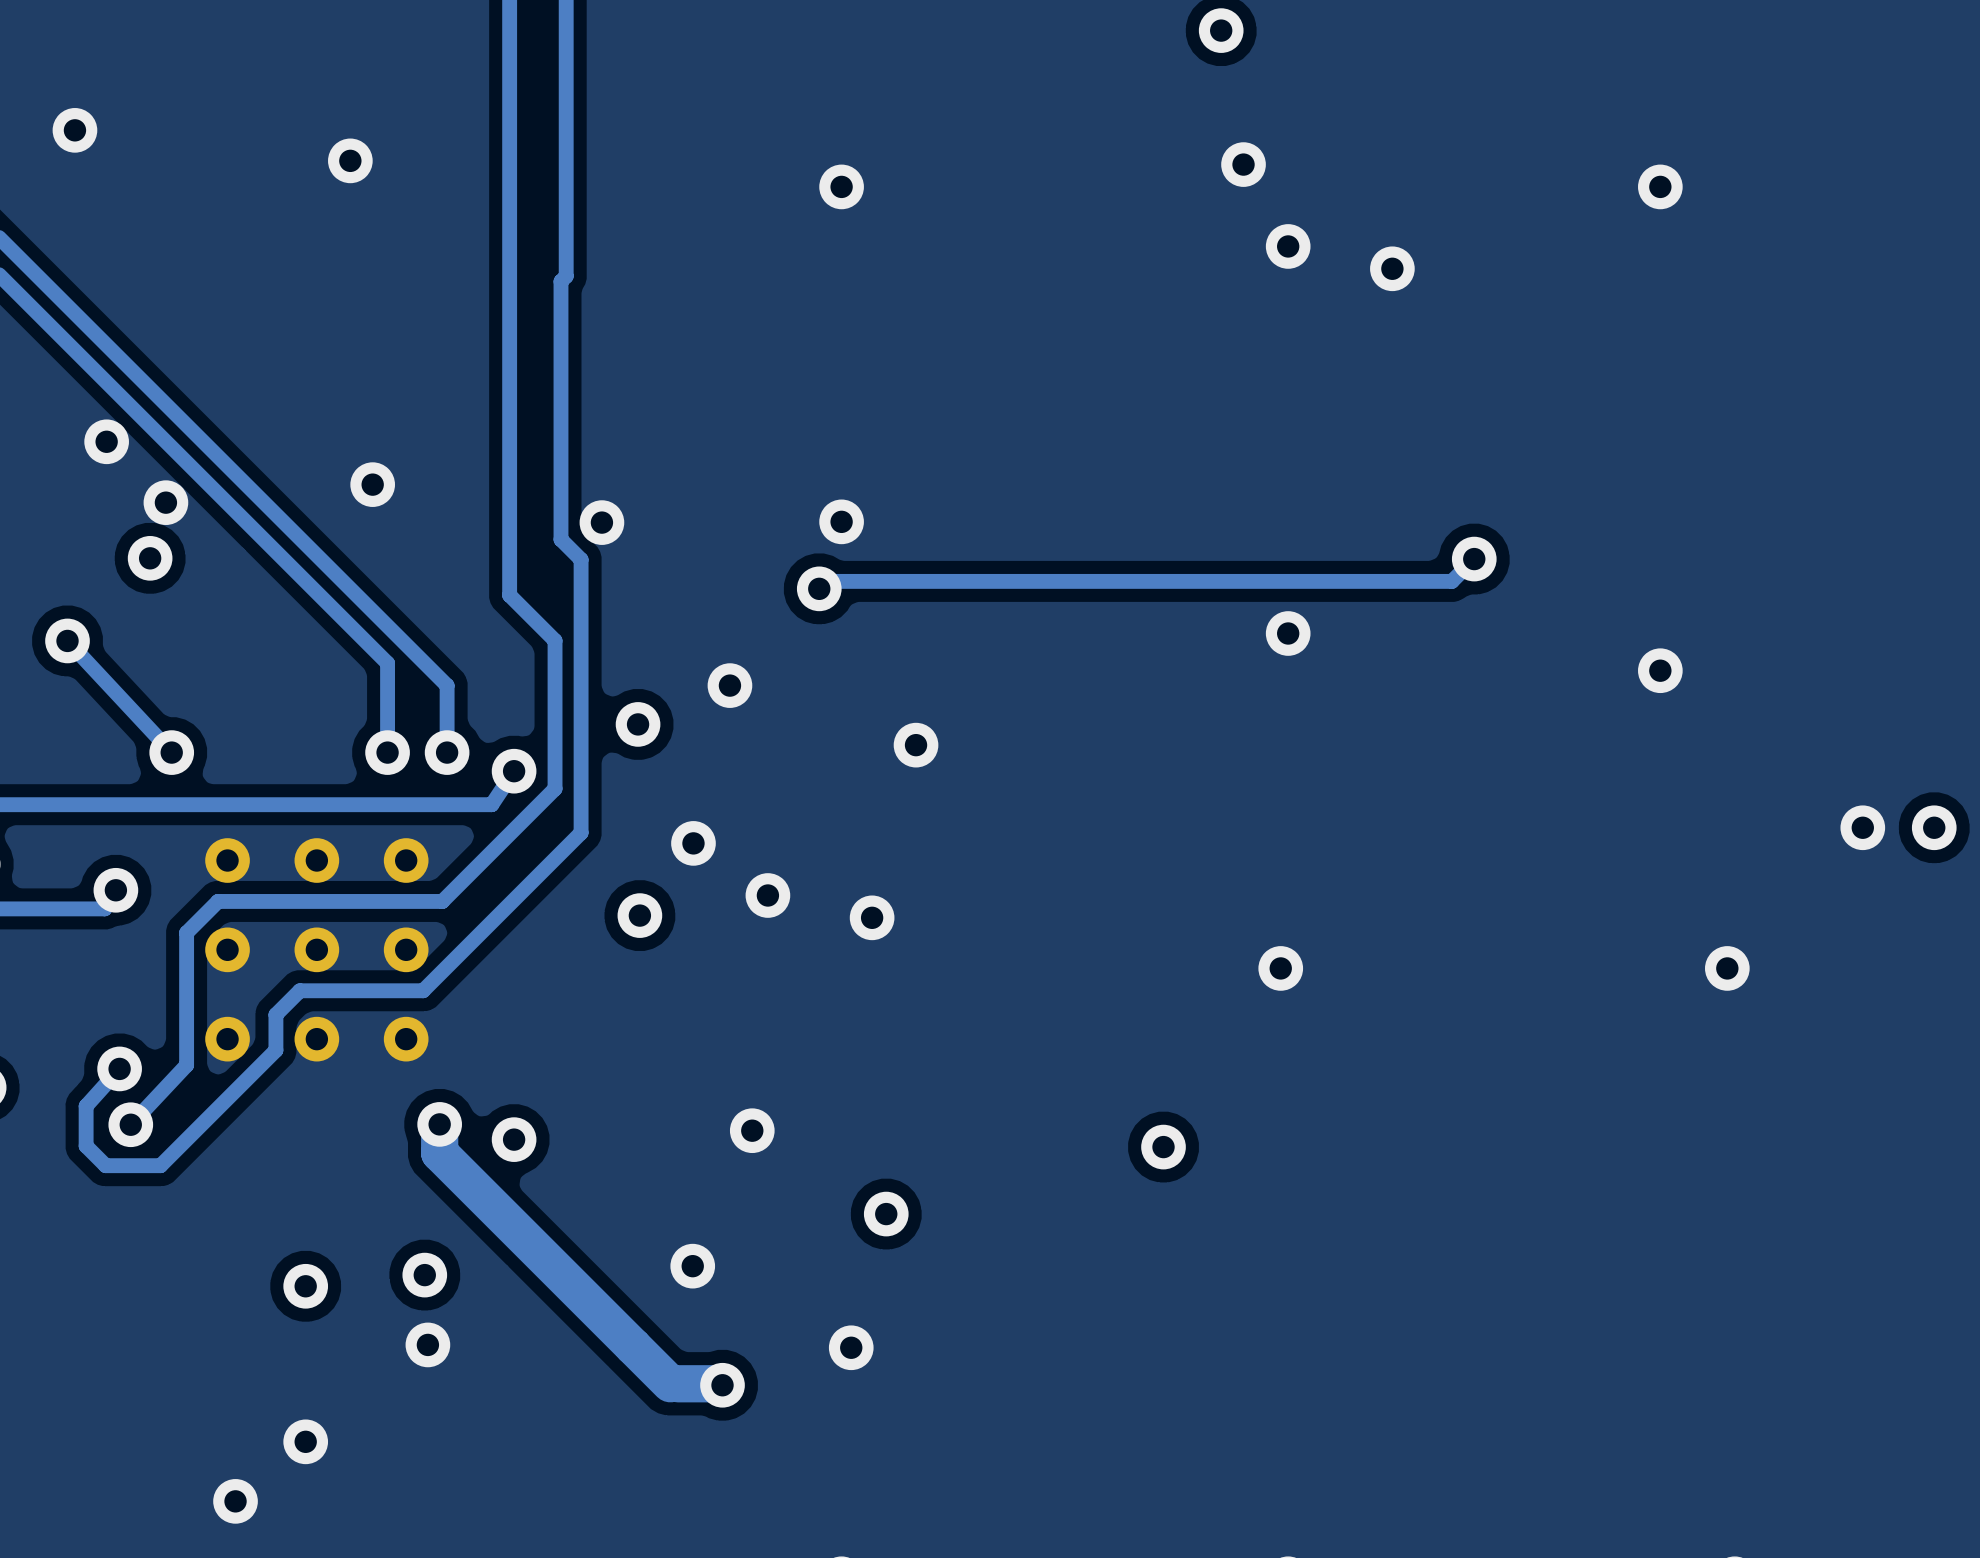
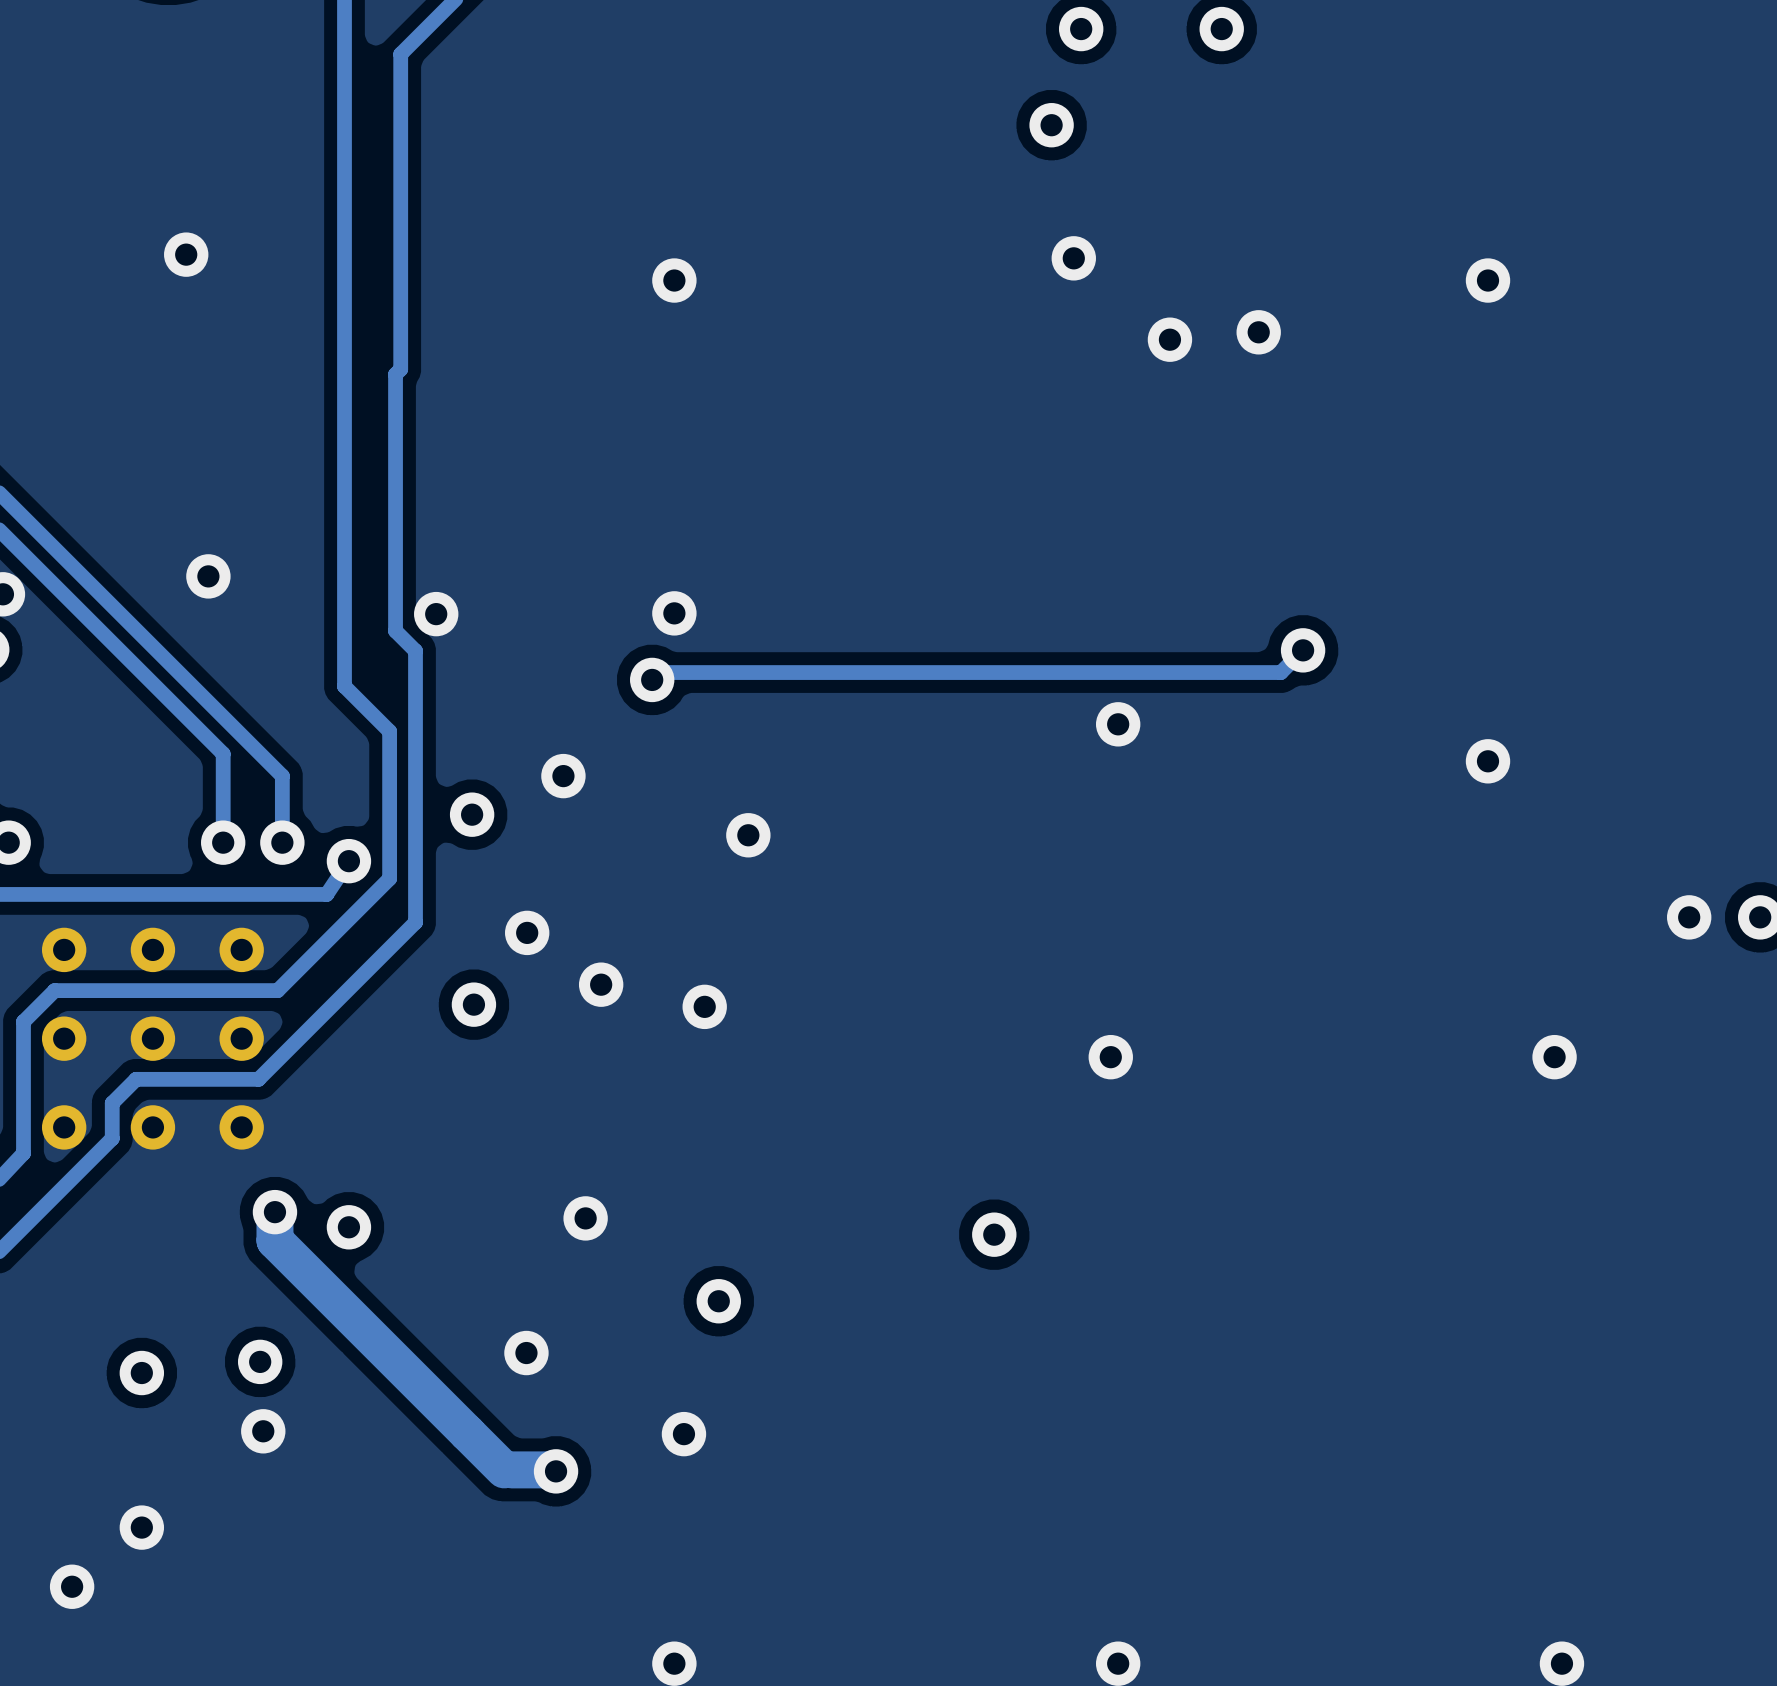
via: (1288, 246) -> none
via: none -> (1169, 339)
via position: (1392, 268) -> (1258, 332)

